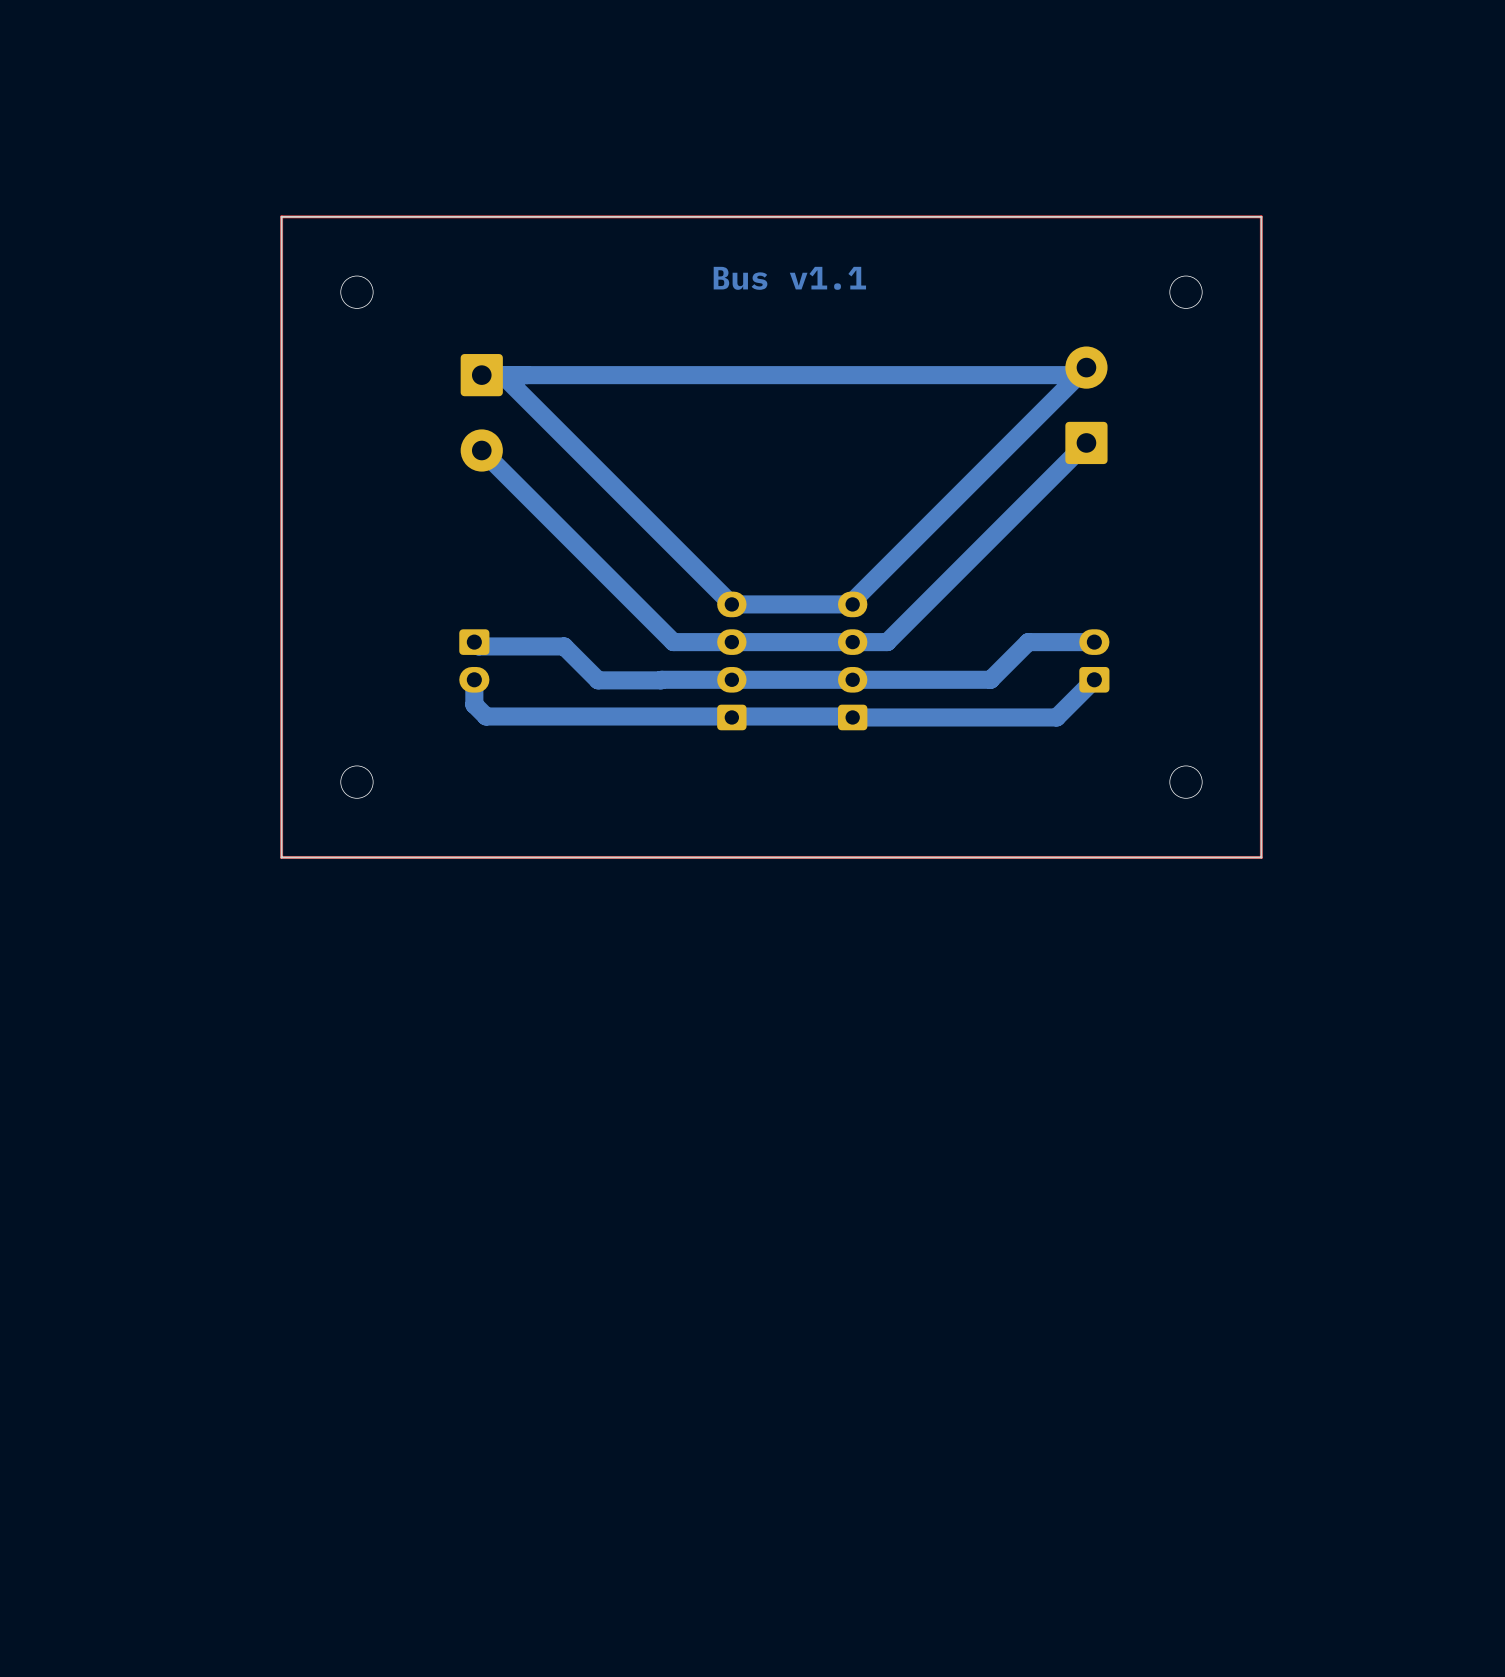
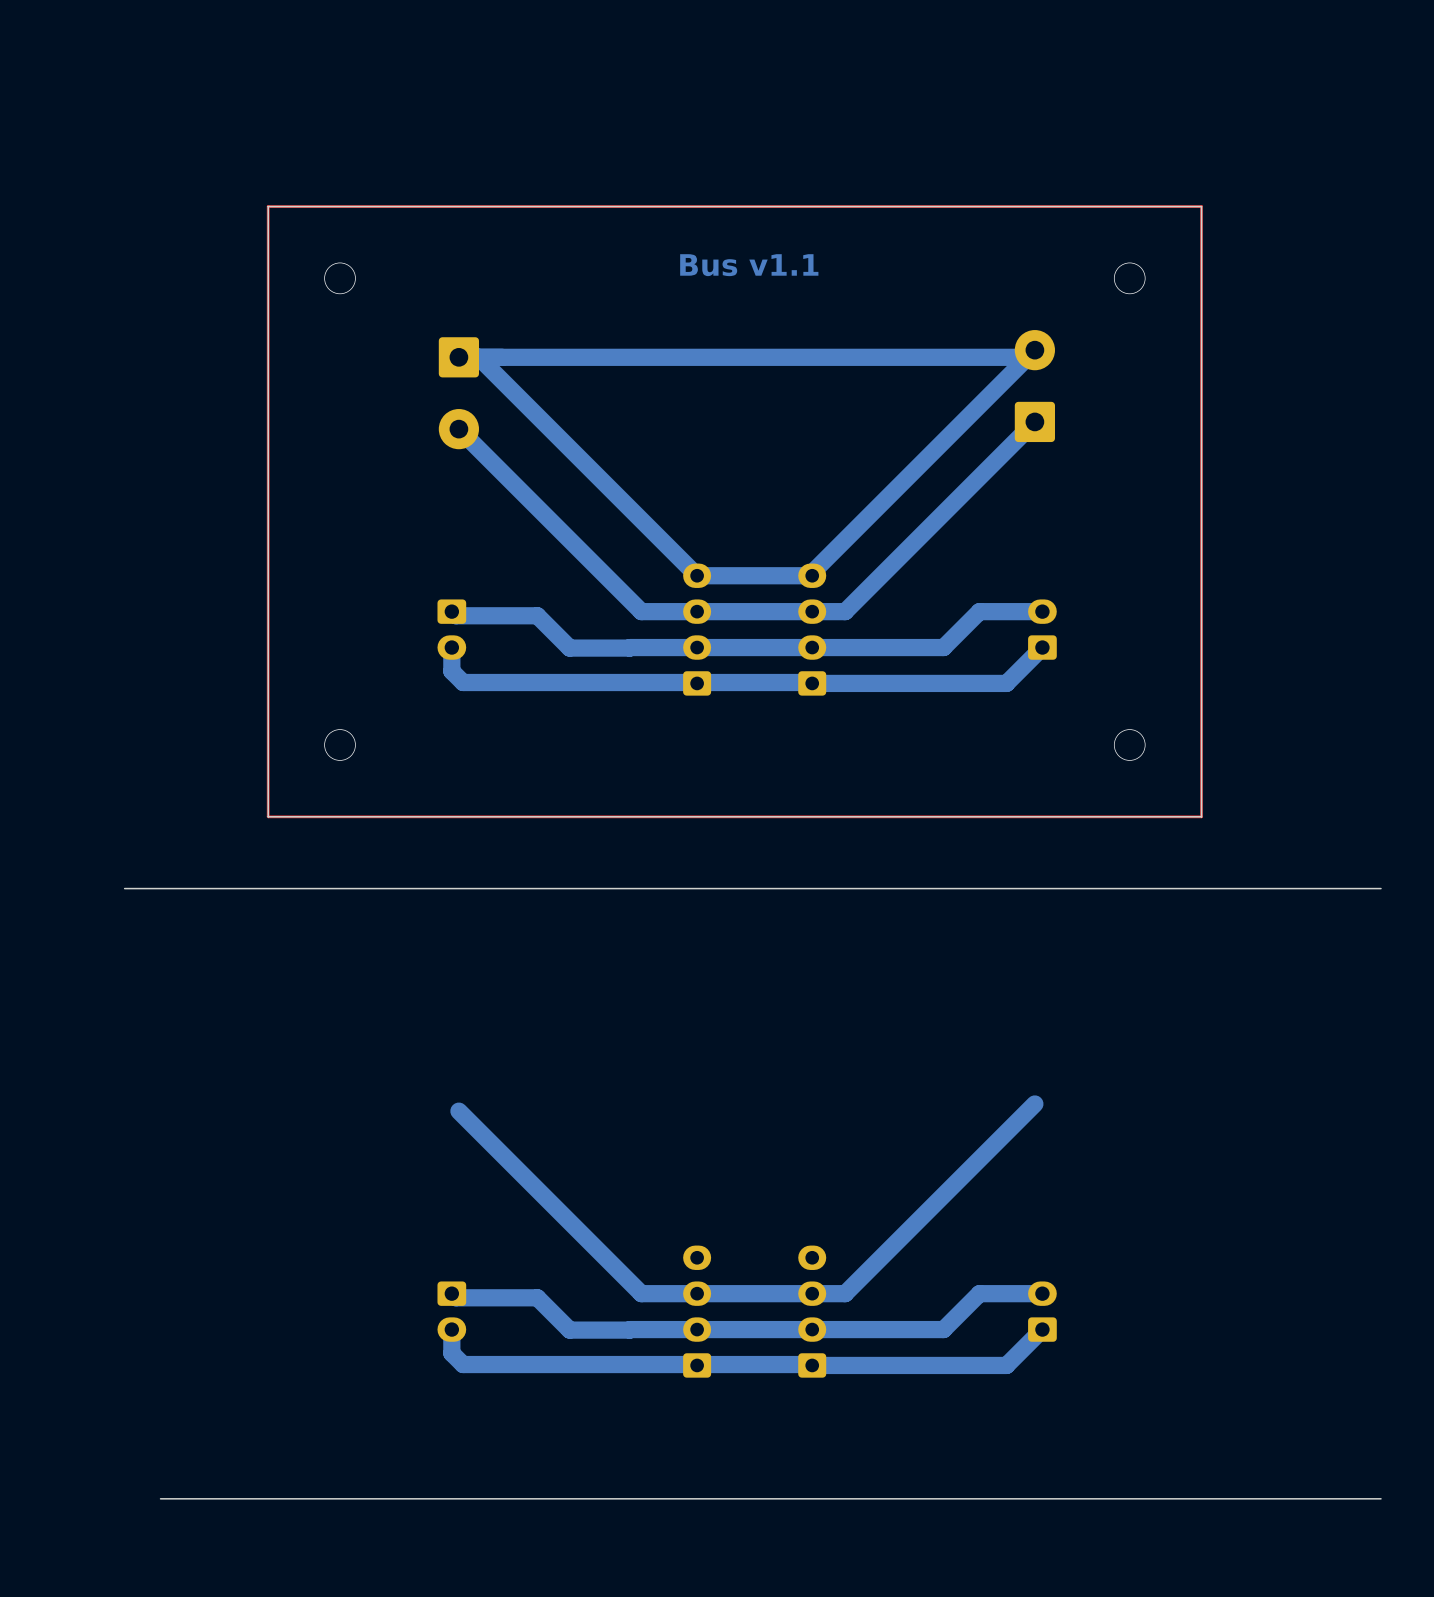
board edge: none -> (1381, 888) (124, 888)
bottom track: none -> (1034, 1103) (845, 1293) (641, 1293) (458, 1111)
bottom track: none -> (1042, 1293) (979, 1293) (943, 1329) (629, 1330) (569, 1330) (537, 1297) (455, 1297) (451, 1293)
part: none -> (451, 1311)
part: none -> (697, 1311)
part: none -> (812, 1311)
part: none -> (1042, 1311)
bottom track: none -> (1042, 1329) (1006, 1365) (463, 1364) (451, 1353) (451, 1329)
board edge: none -> (1381, 1498) (160, 1498)

